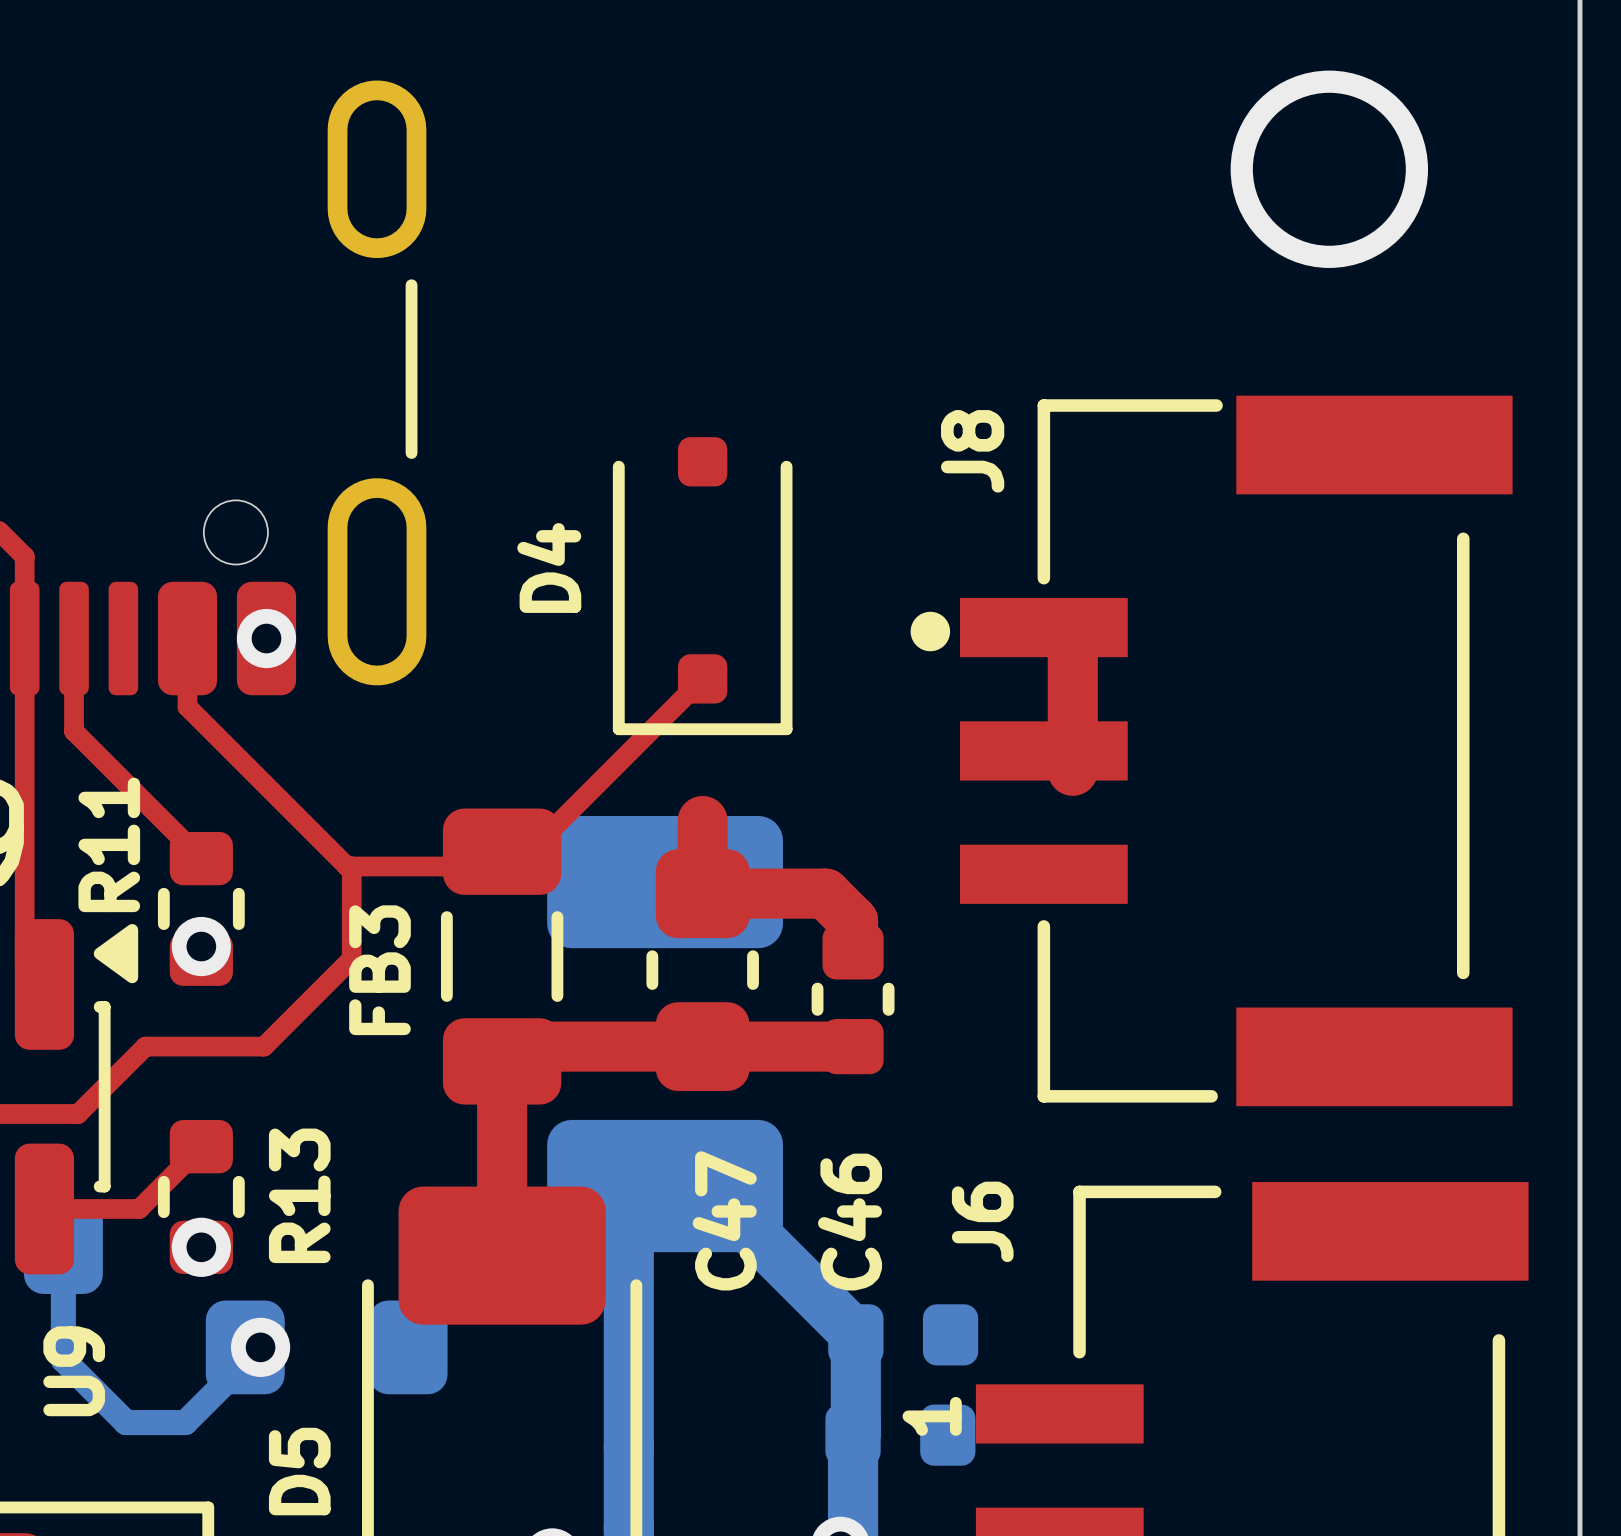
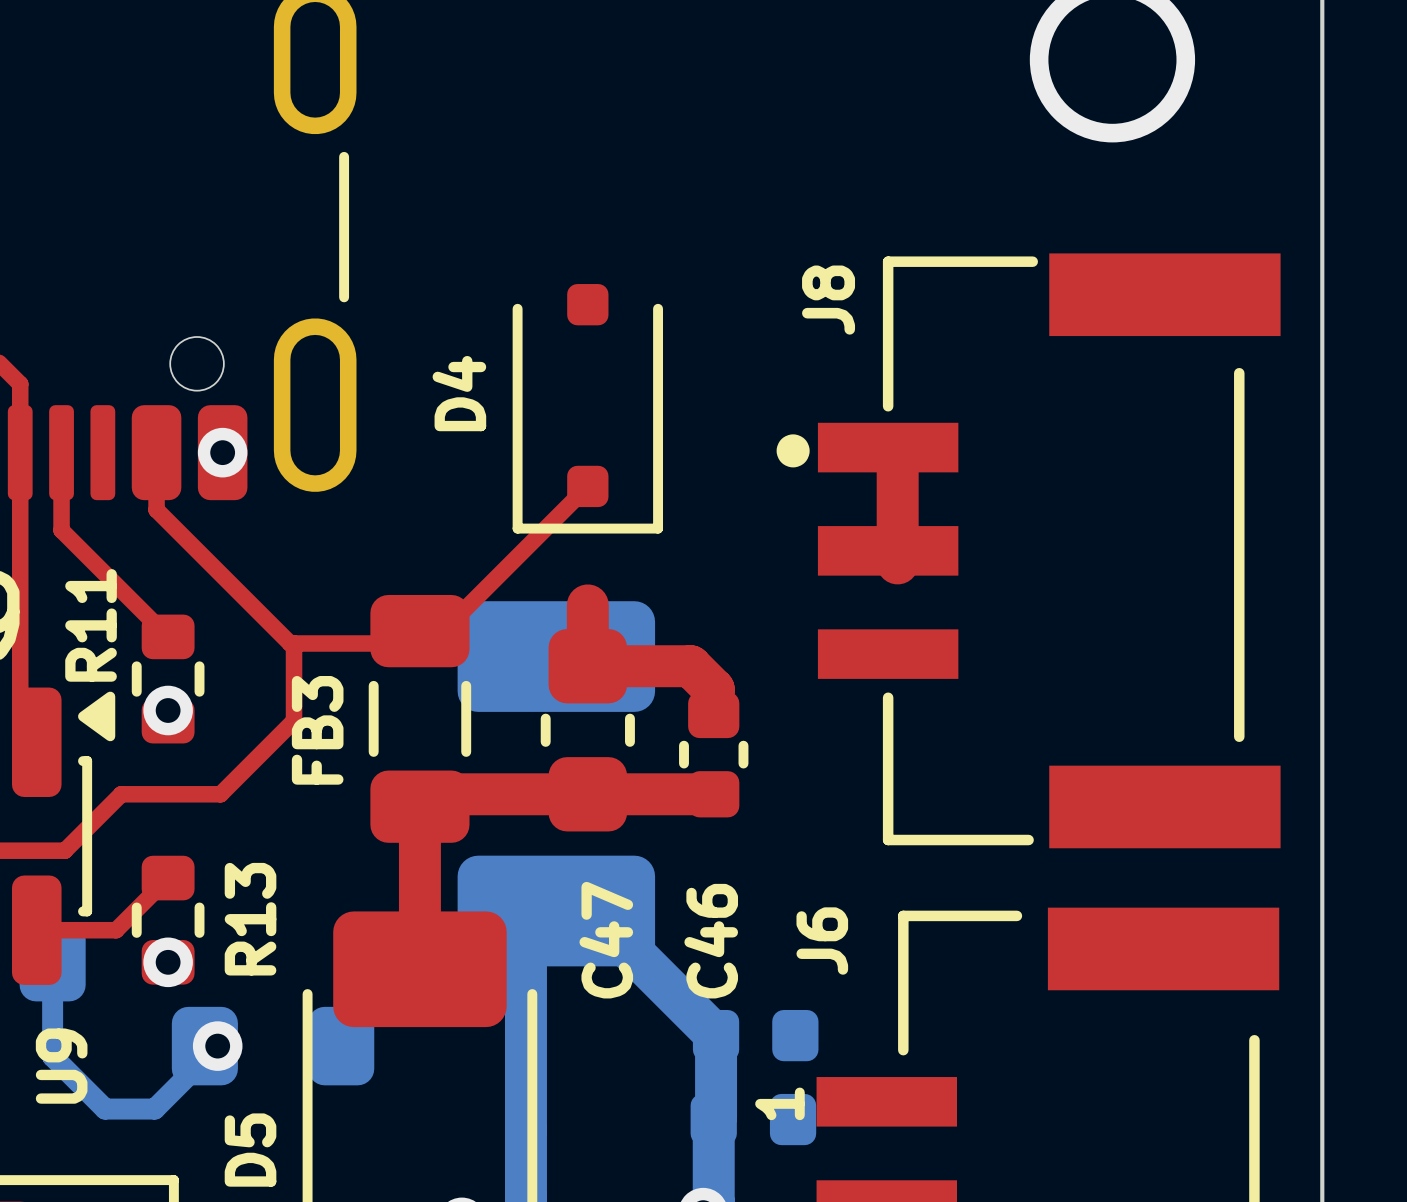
J8 position: (1211, 750) -> (1028, 550)

